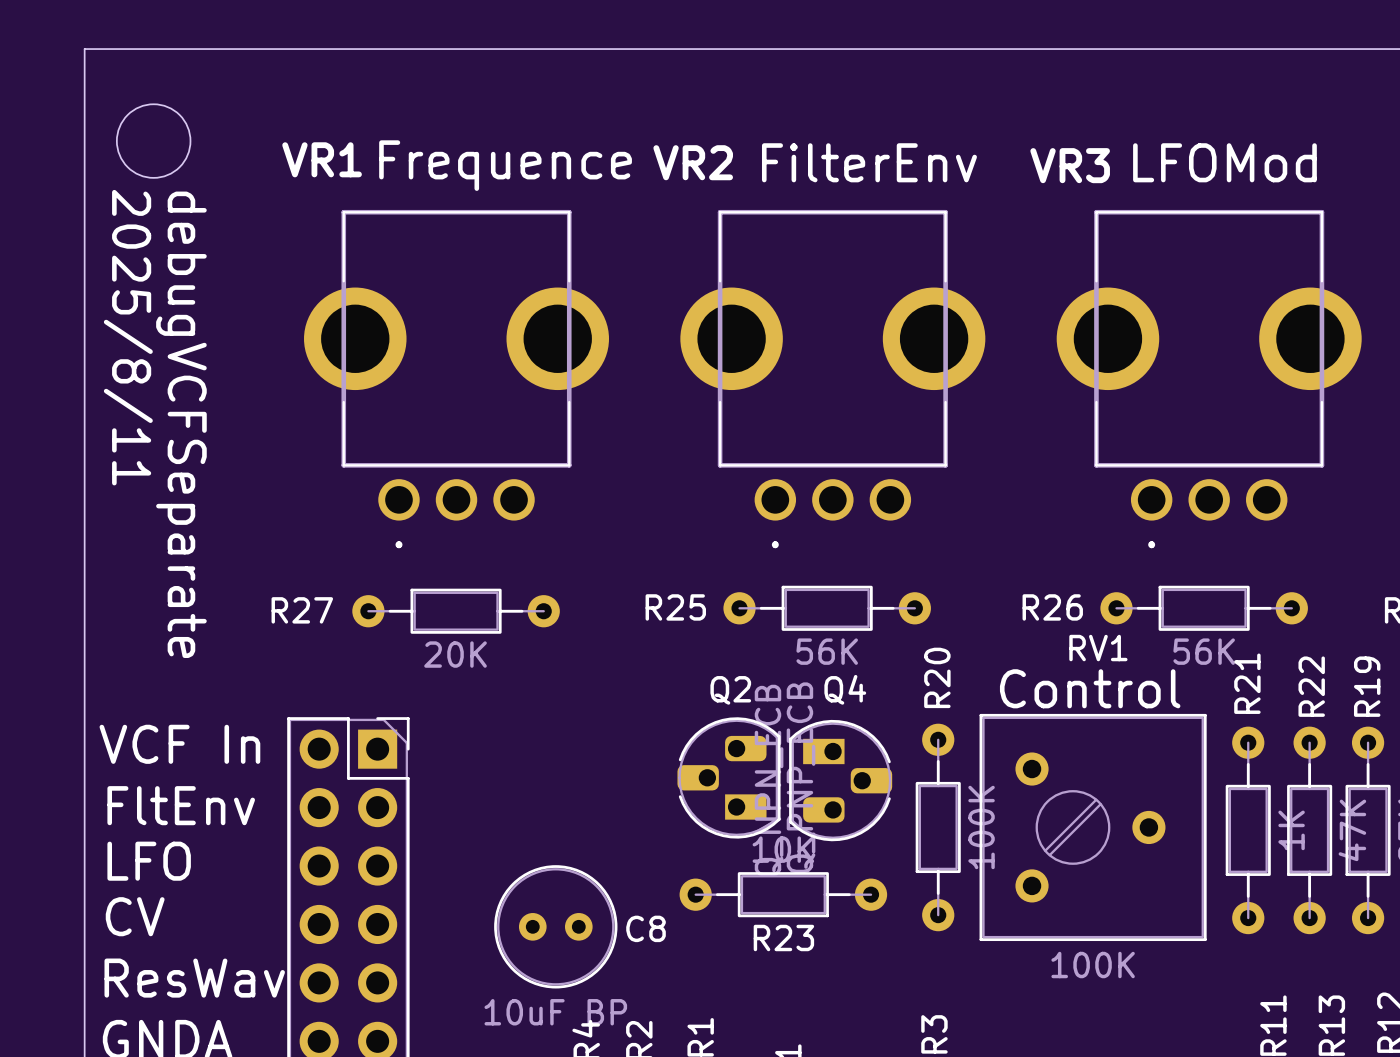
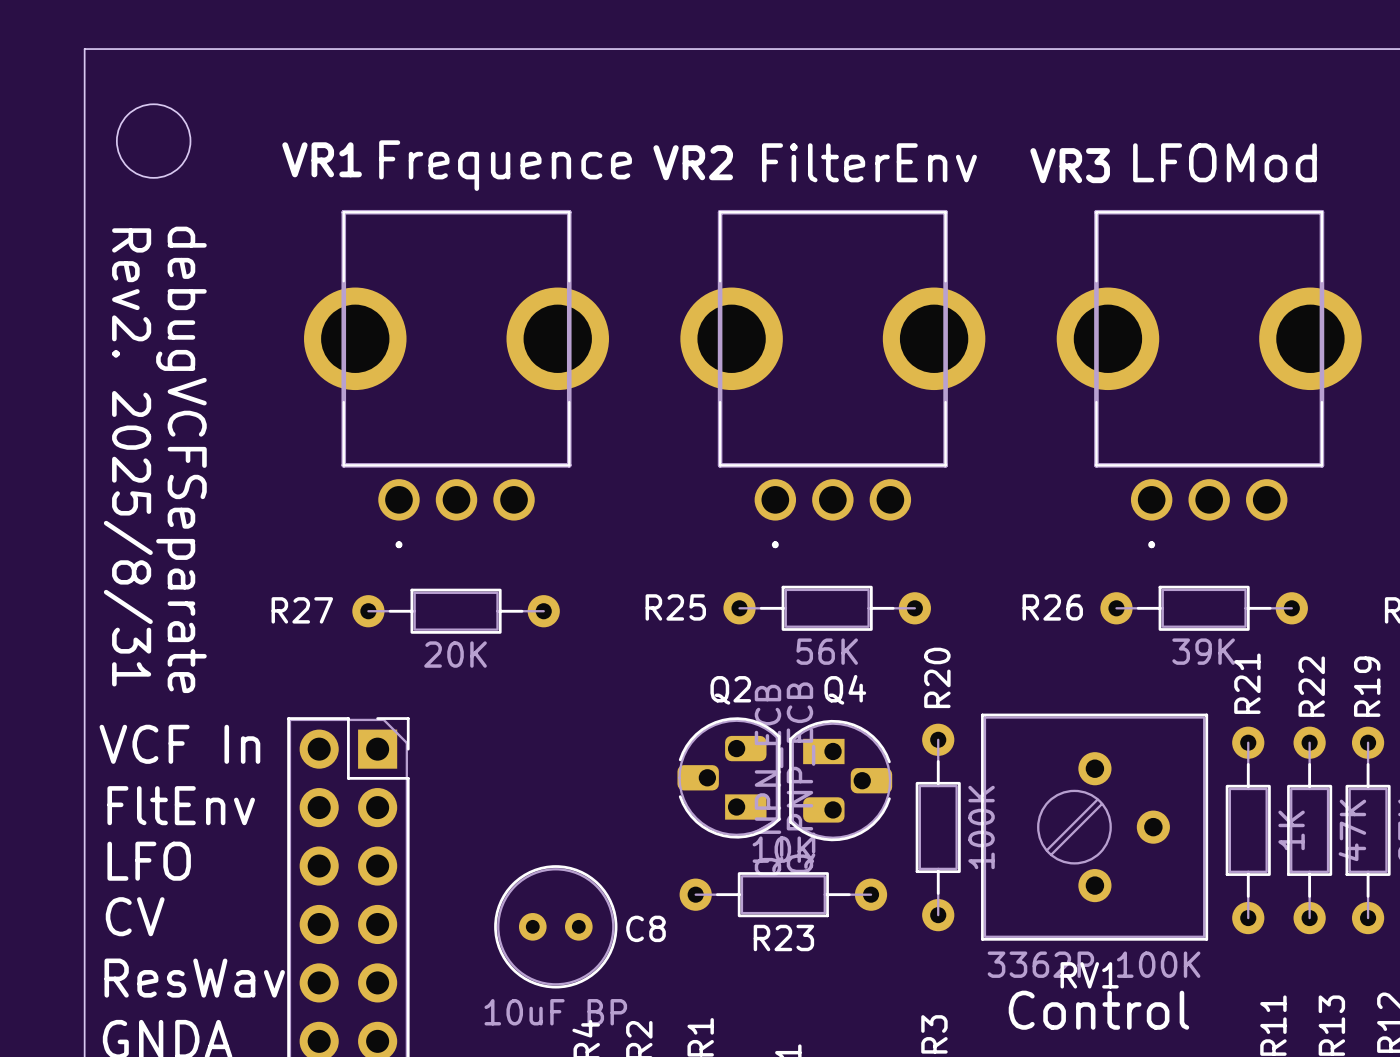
text: 2025/8/11 (128, 337) -> Rev2. 2025/8/31 (128, 457)
text position: debugVCFSeparate (181, 424) -> debugVCFSeparate (181, 459)
RV1 name position: RV1 (1098, 648) -> RV1 (1089, 975)
R26 value: 56K (1204, 651) -> 39K (1203, 651)
text position: Control (1090, 688) -> Control (1098, 1010)
RV1 footprint: [979, 713, 1207, 942] -> [981, 713, 1209, 941]
RV1 value: 100K (1093, 965) -> 3362P 100K (1094, 964)

